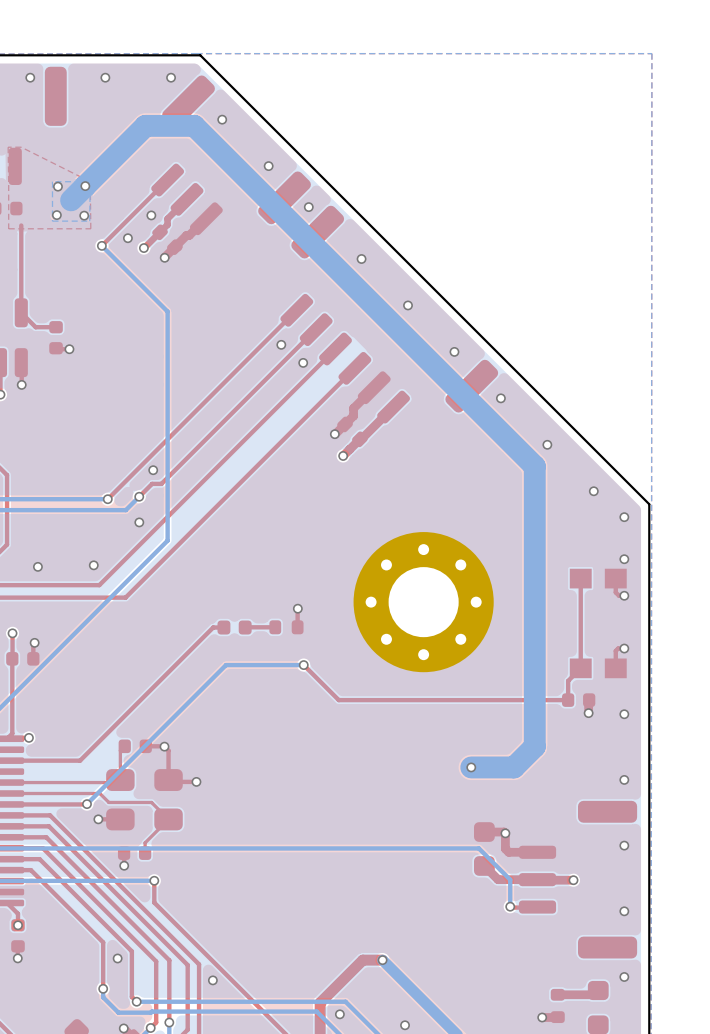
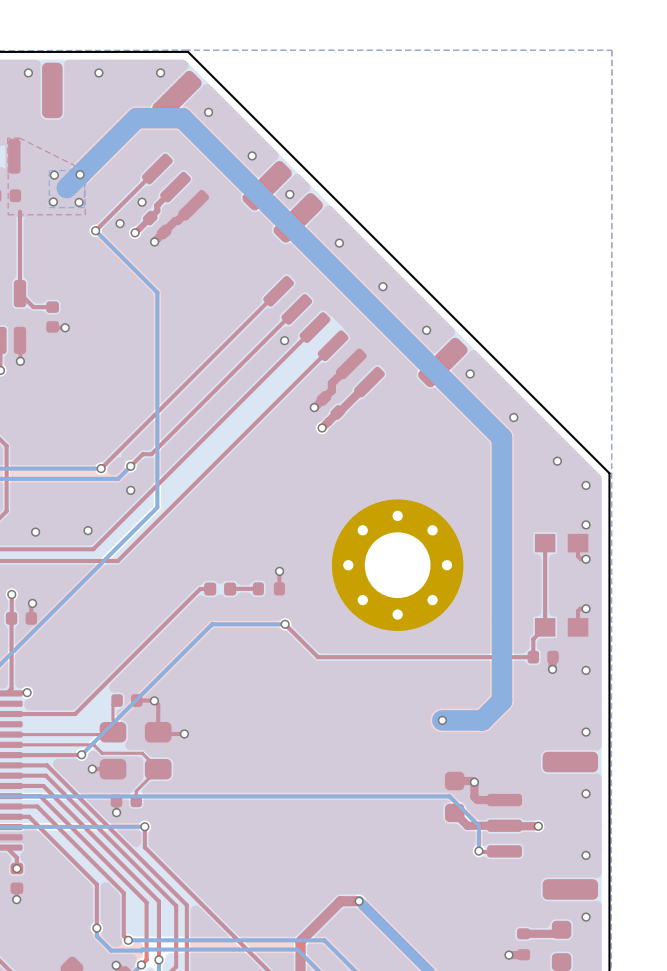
via: (281, 344) -> none
via: (153, 470) -> none
via: (117, 958) -> none
via: (212, 980) -> none
via: (339, 1014) -> none
via: (405, 1025) -> none

